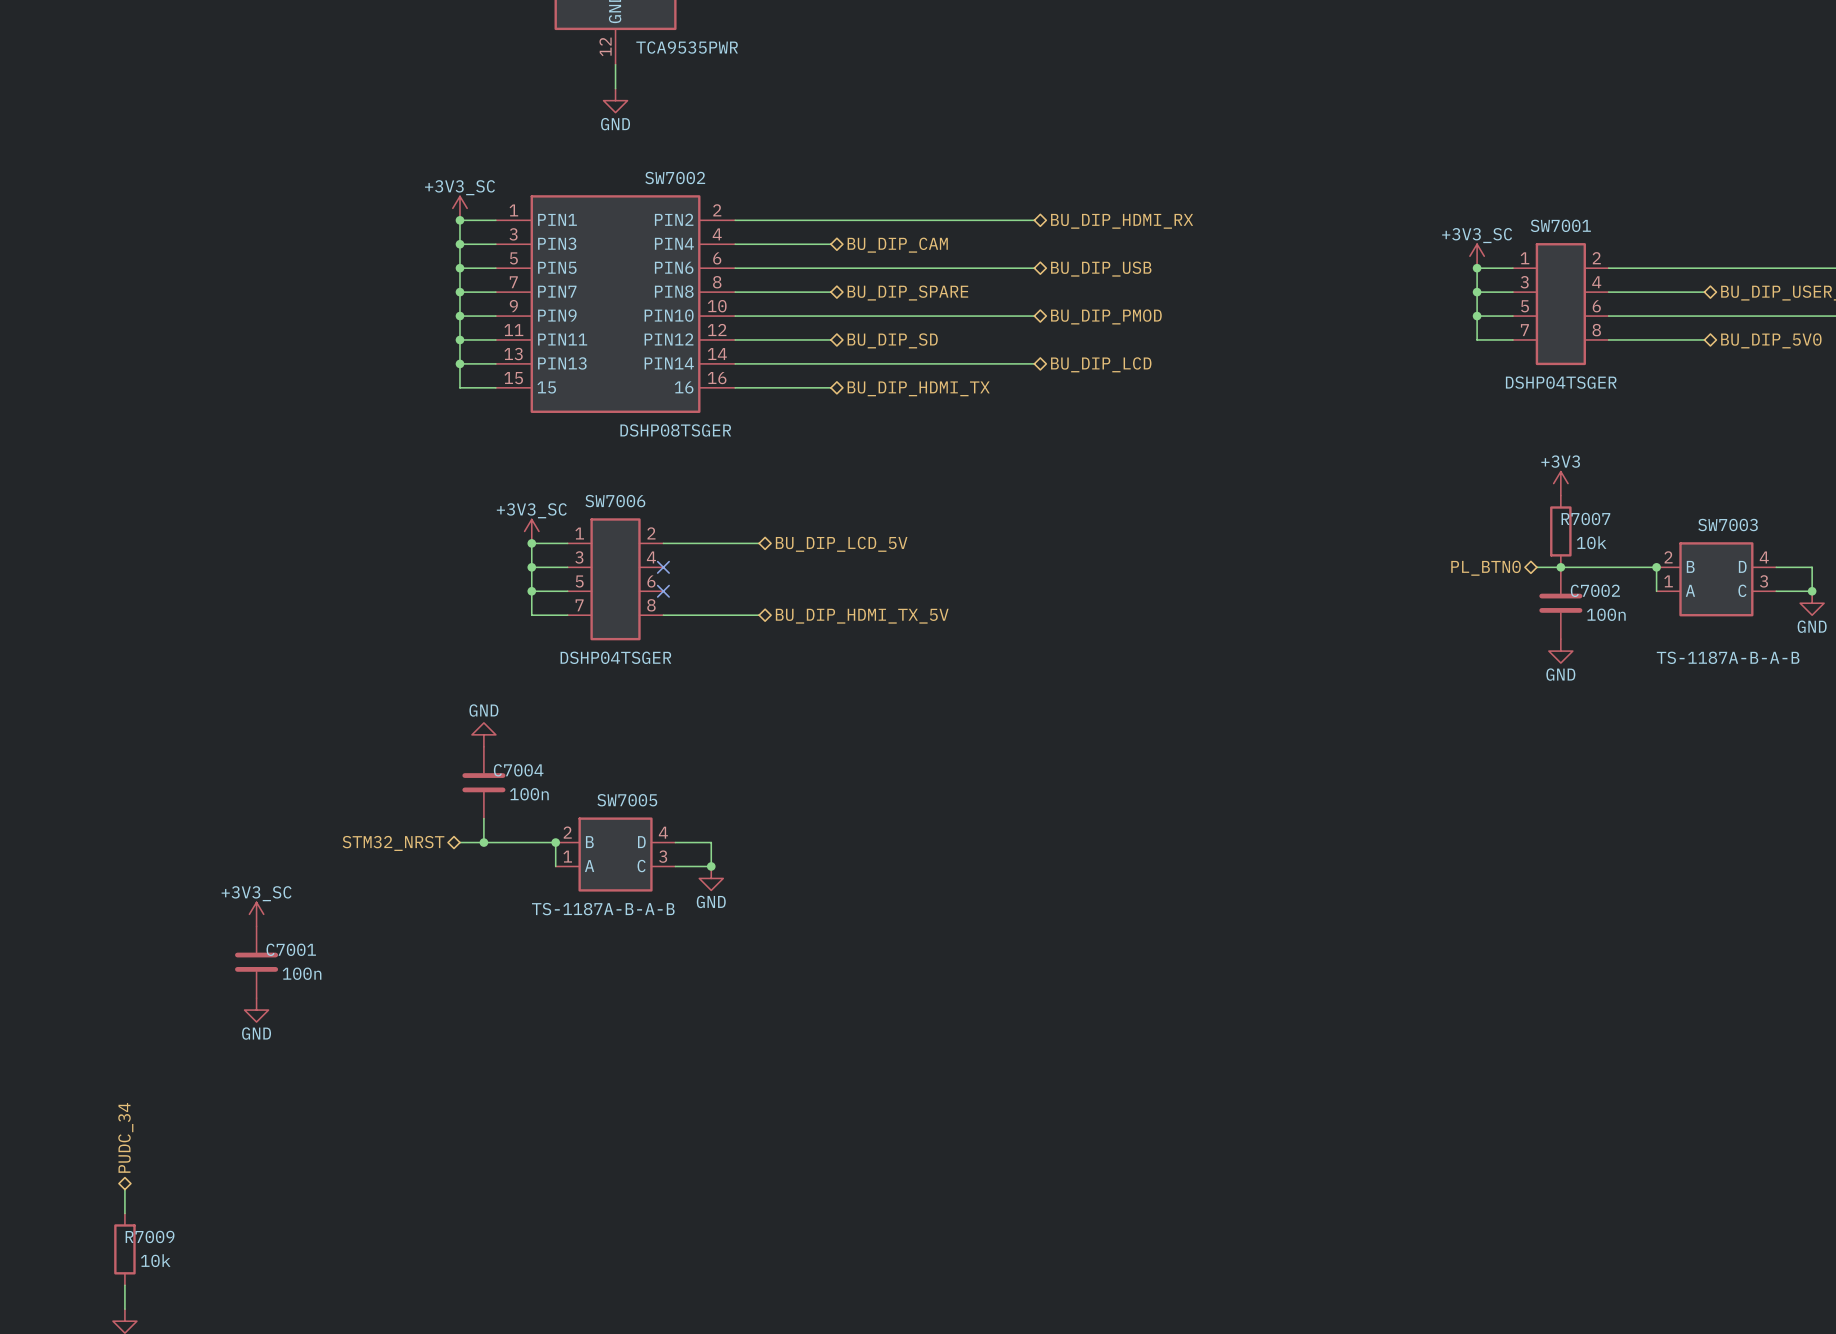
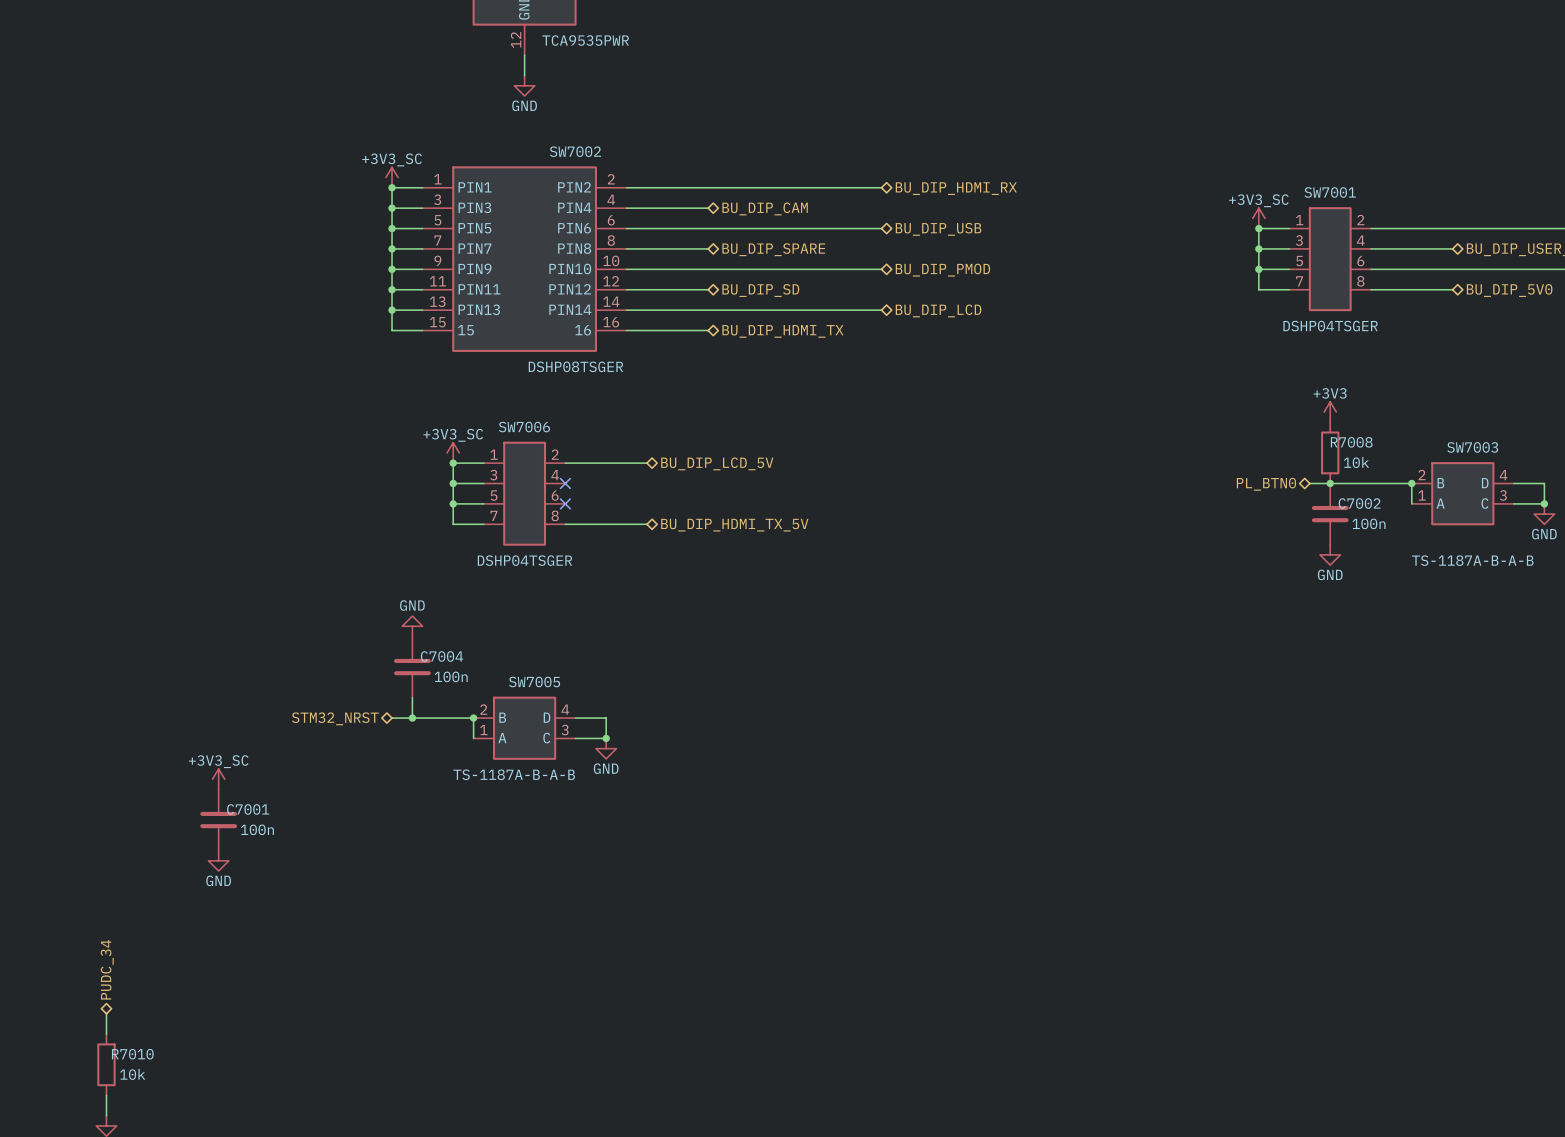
R7007 name: R7007 (1585, 519) -> R7008 (1351, 442)
R7009 name: R7009 (150, 1236) -> R7010 (132, 1054)

